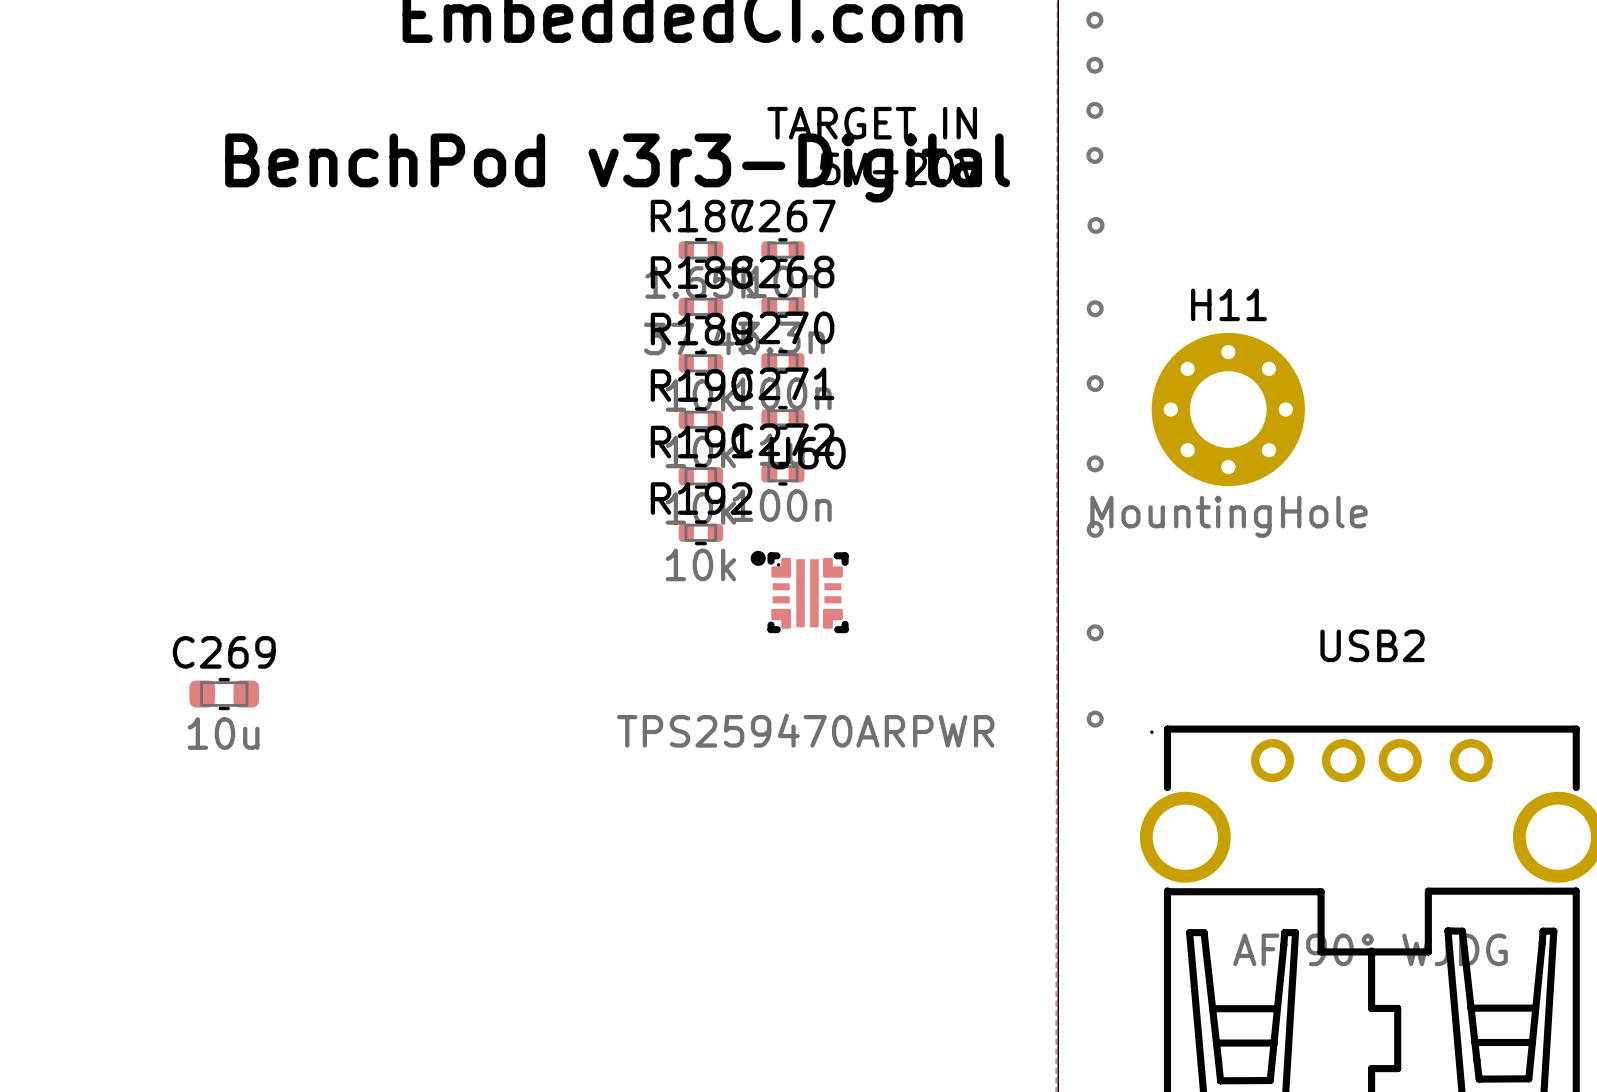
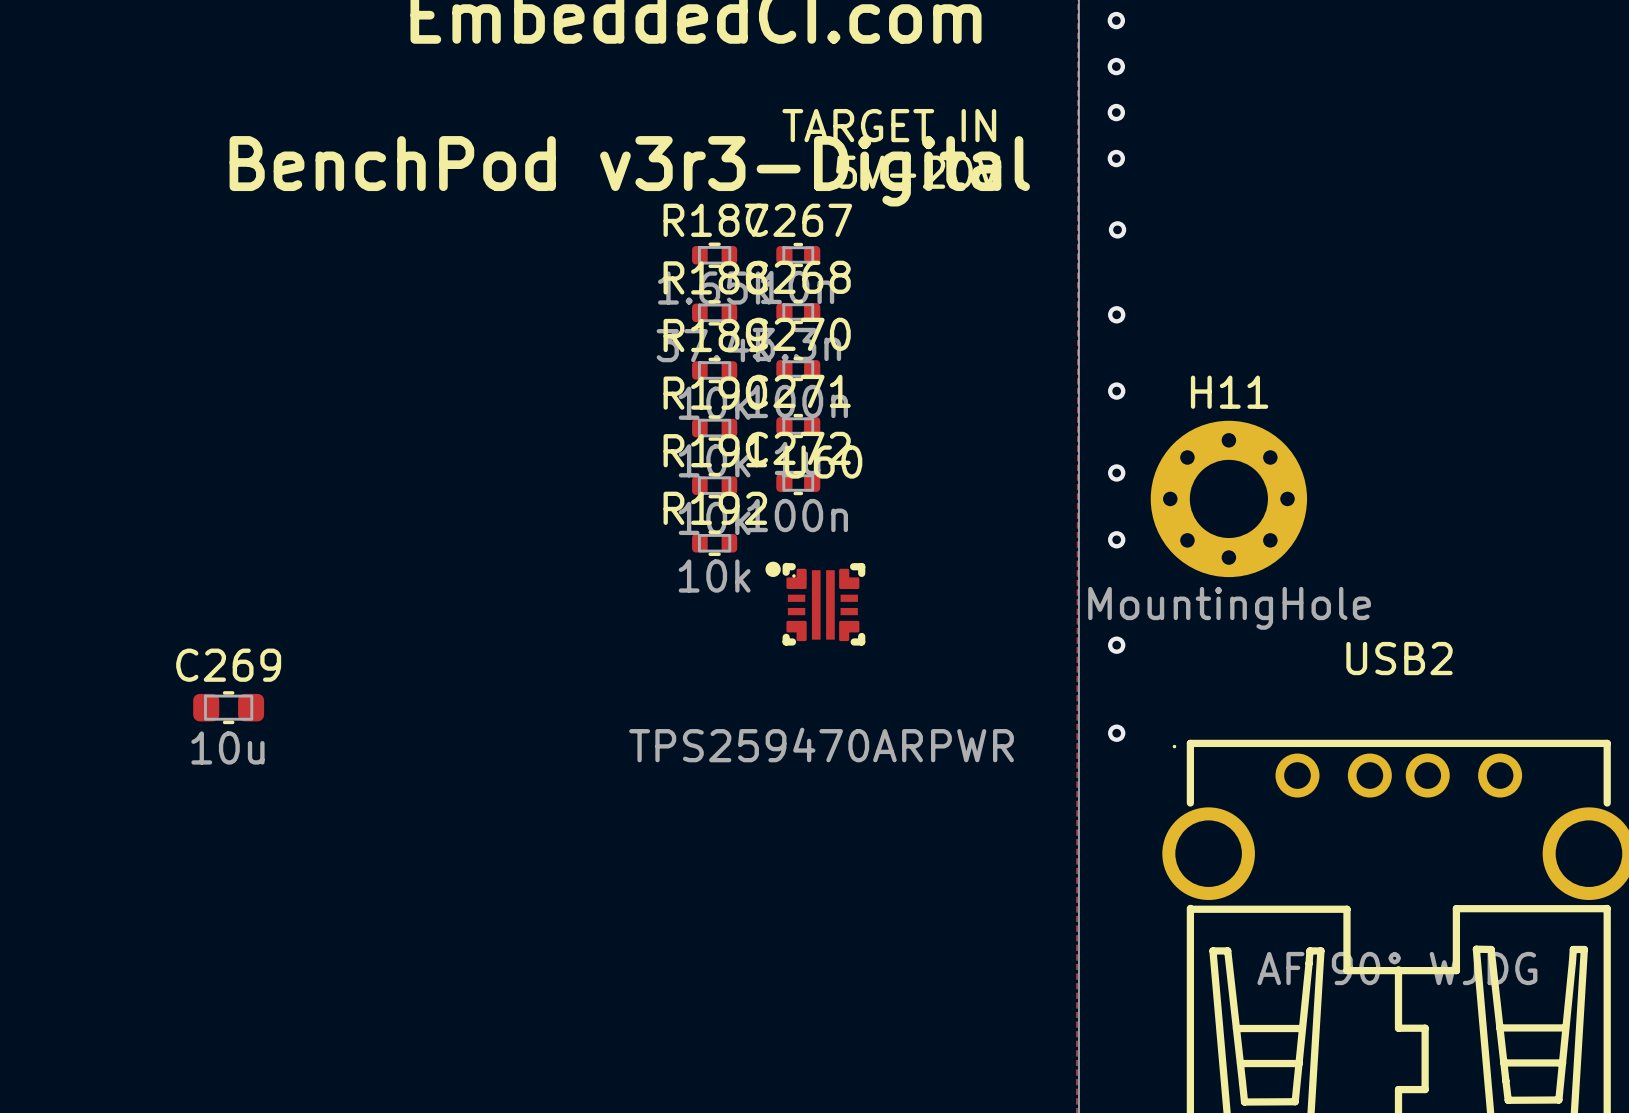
H11 position: (1228, 409) -> (1228, 498)

